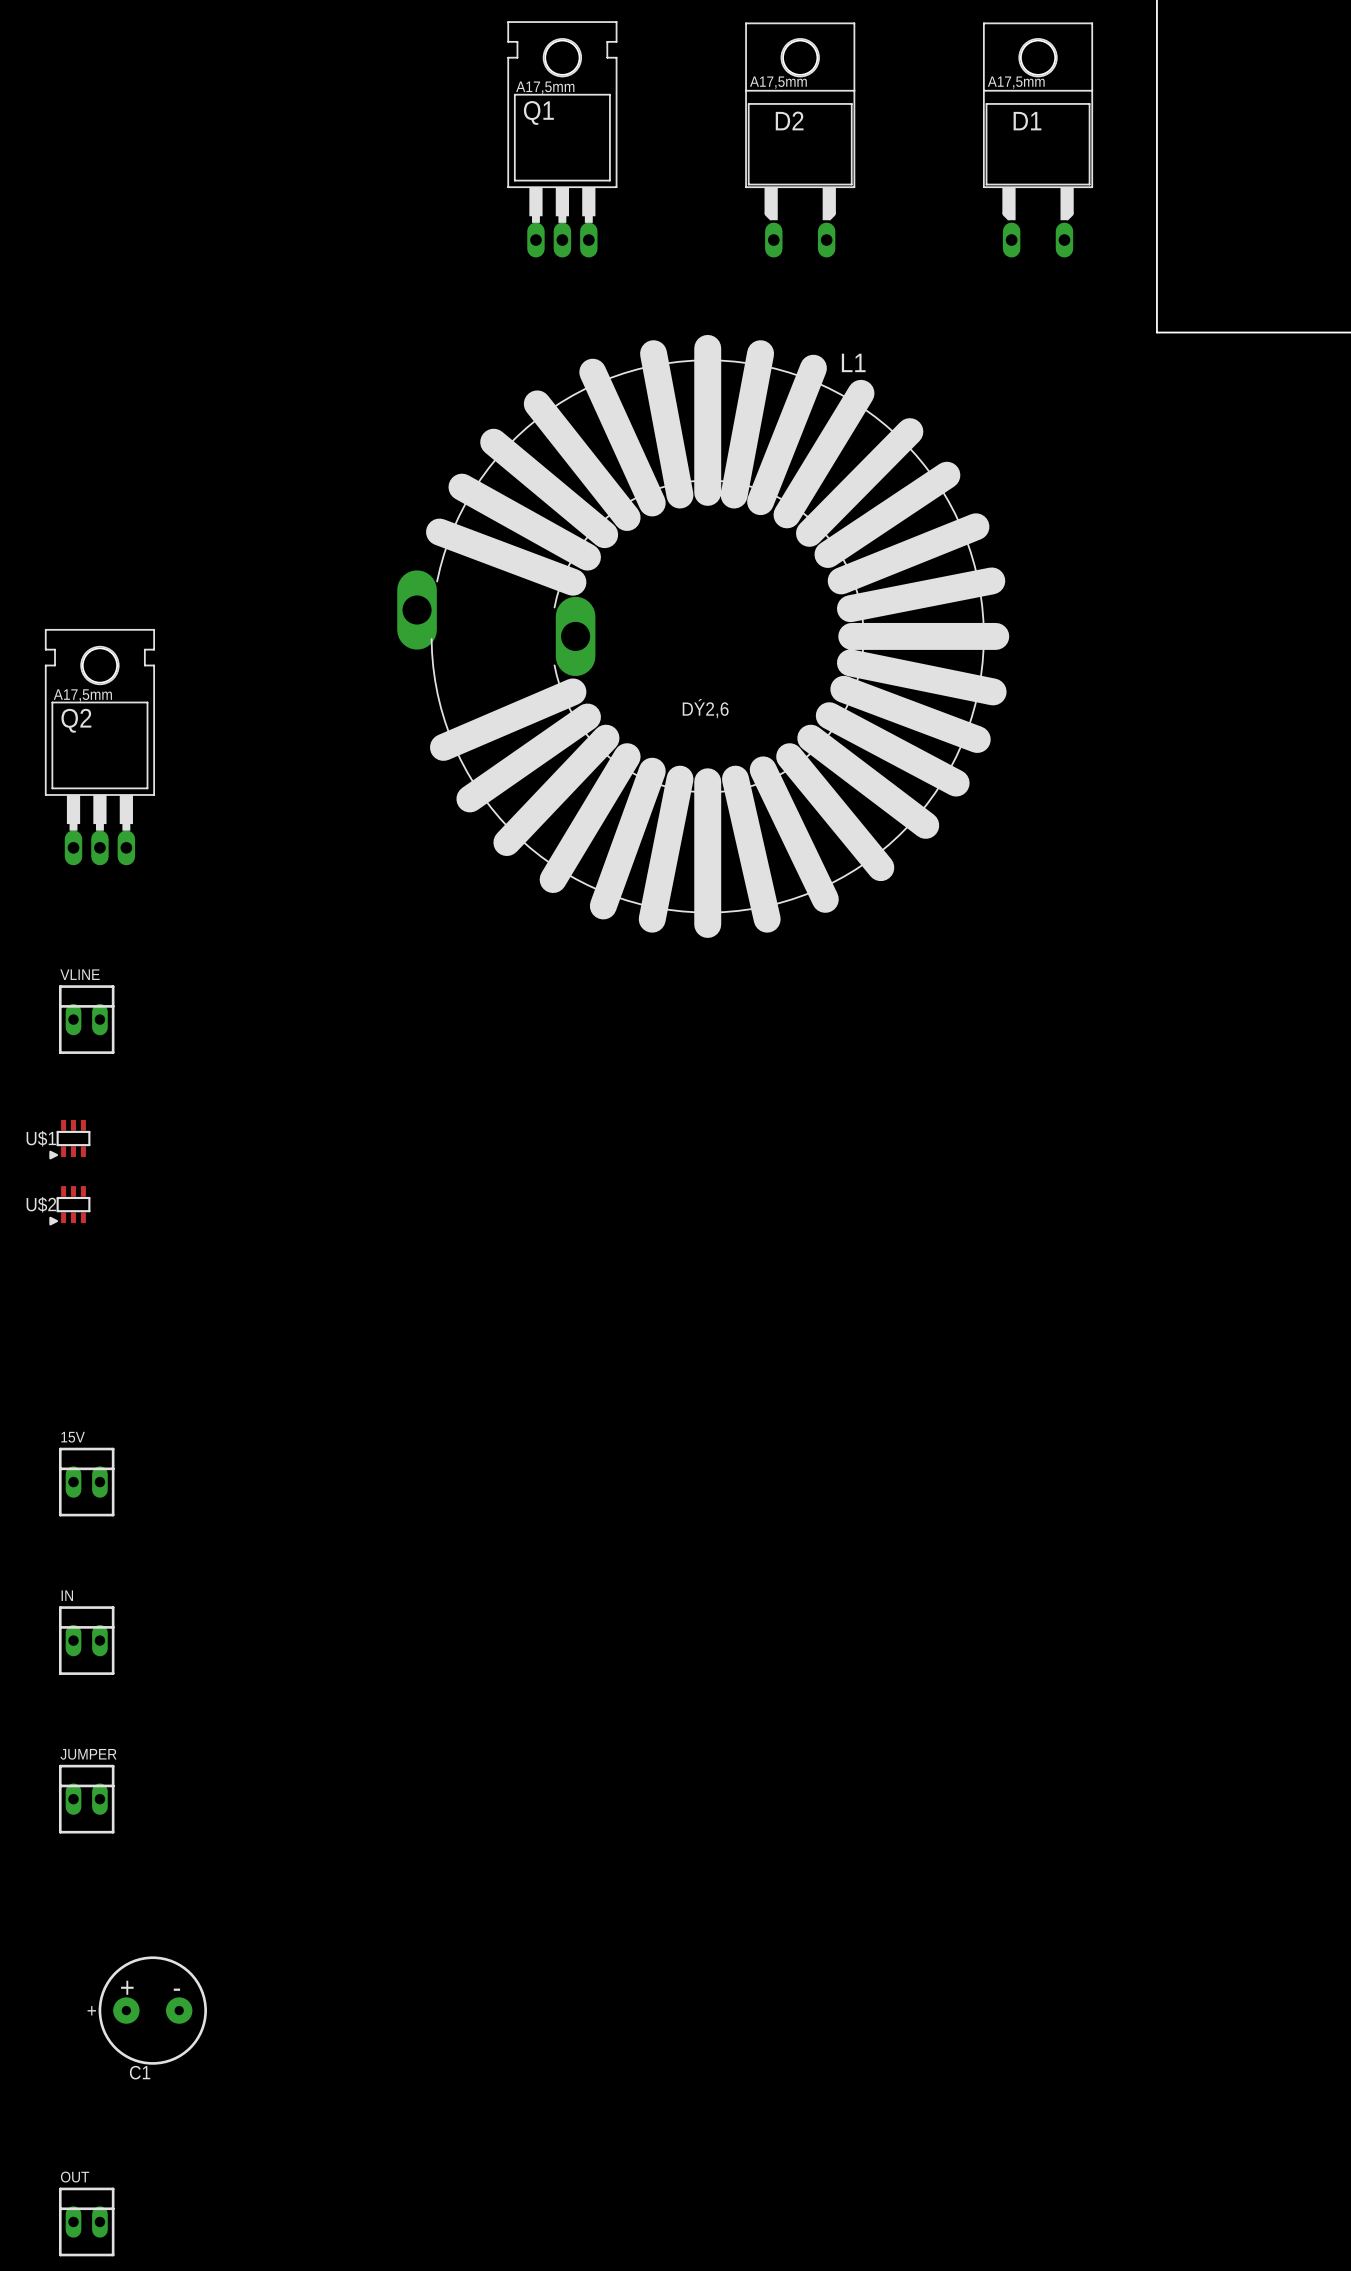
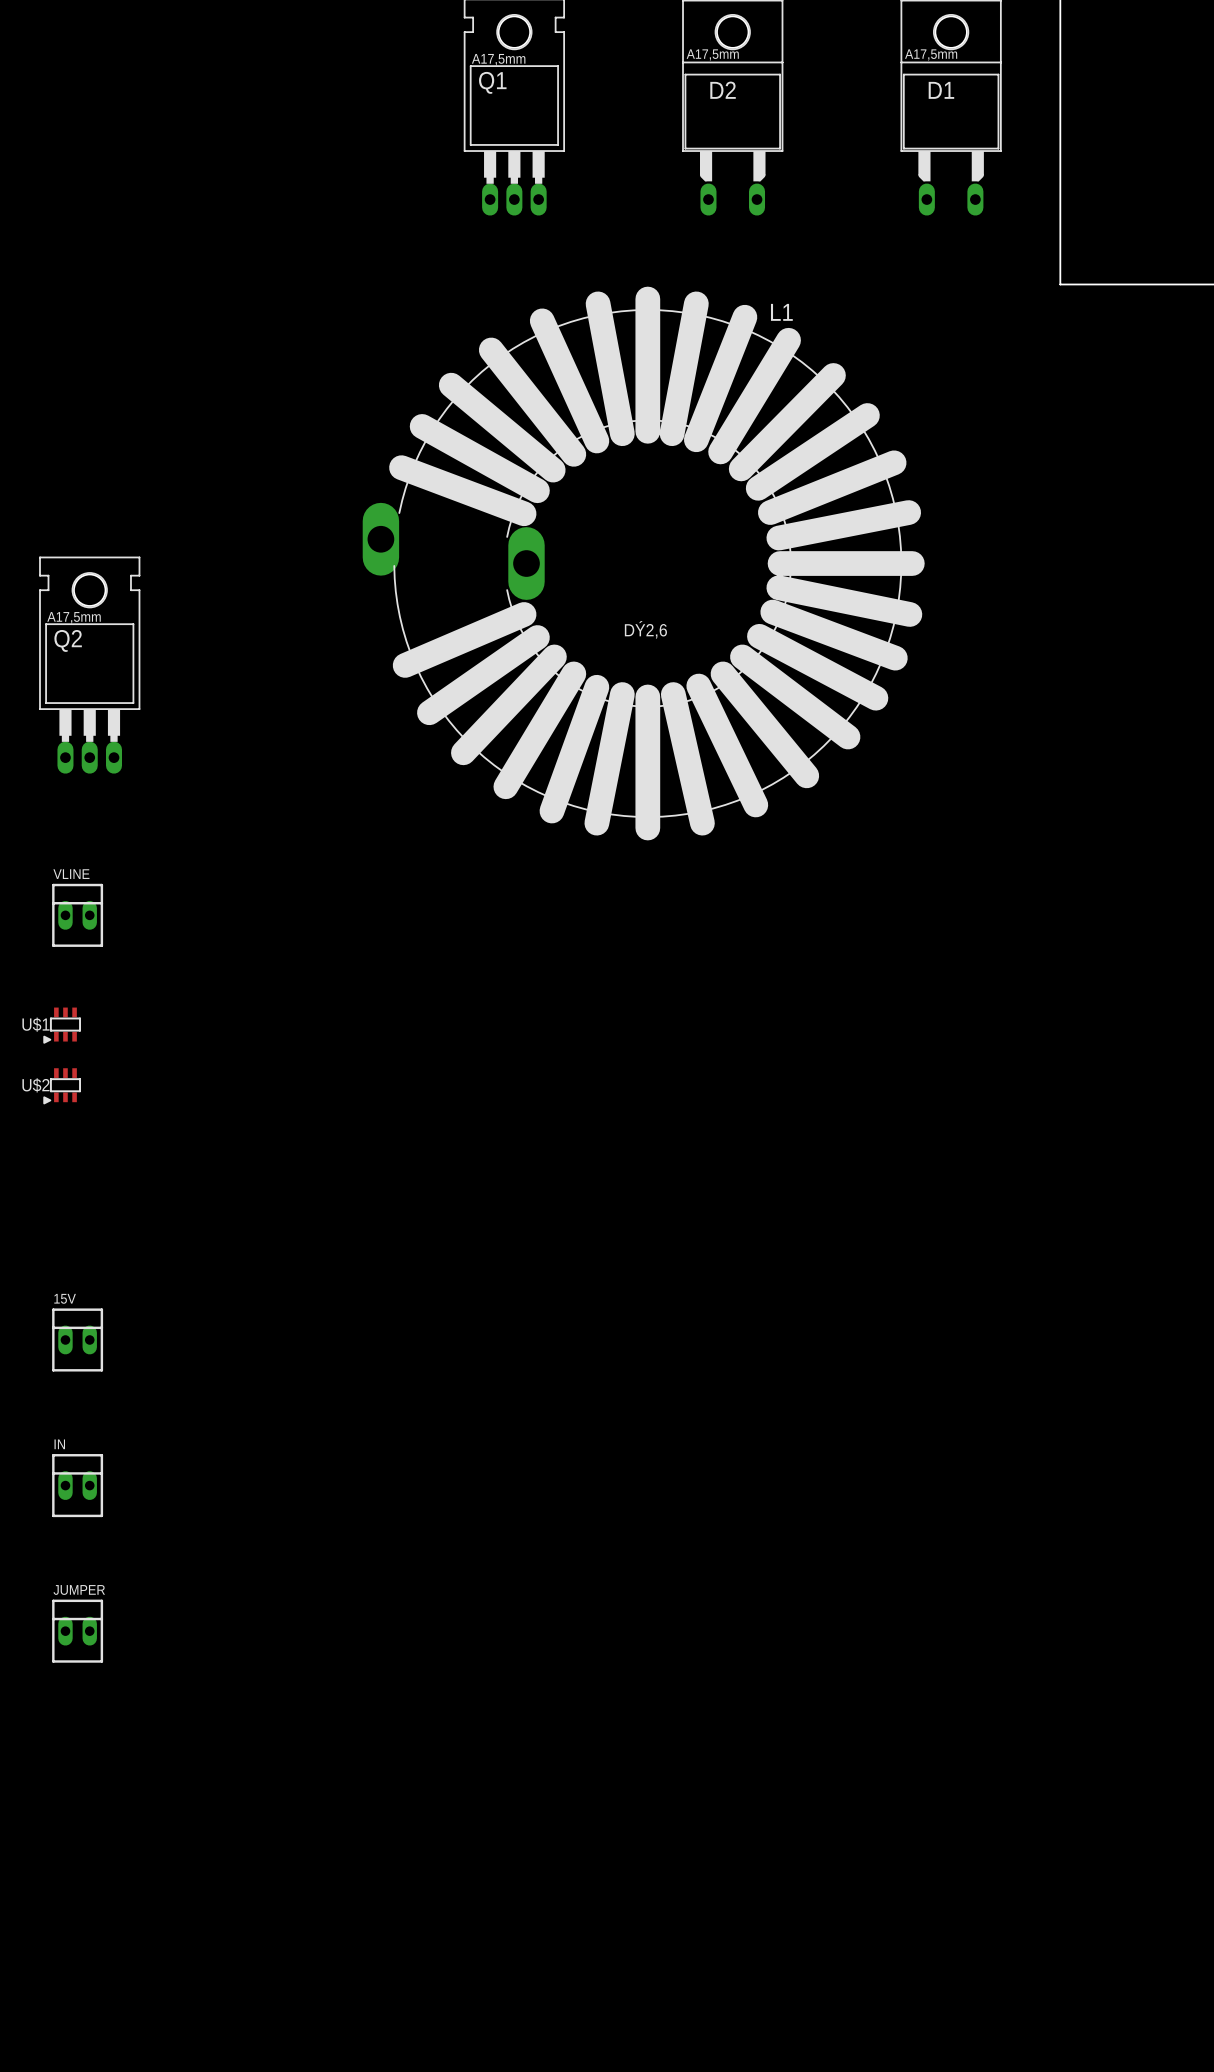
C1: (152, 2010) -> none
OUT: (86, 2221) -> none

